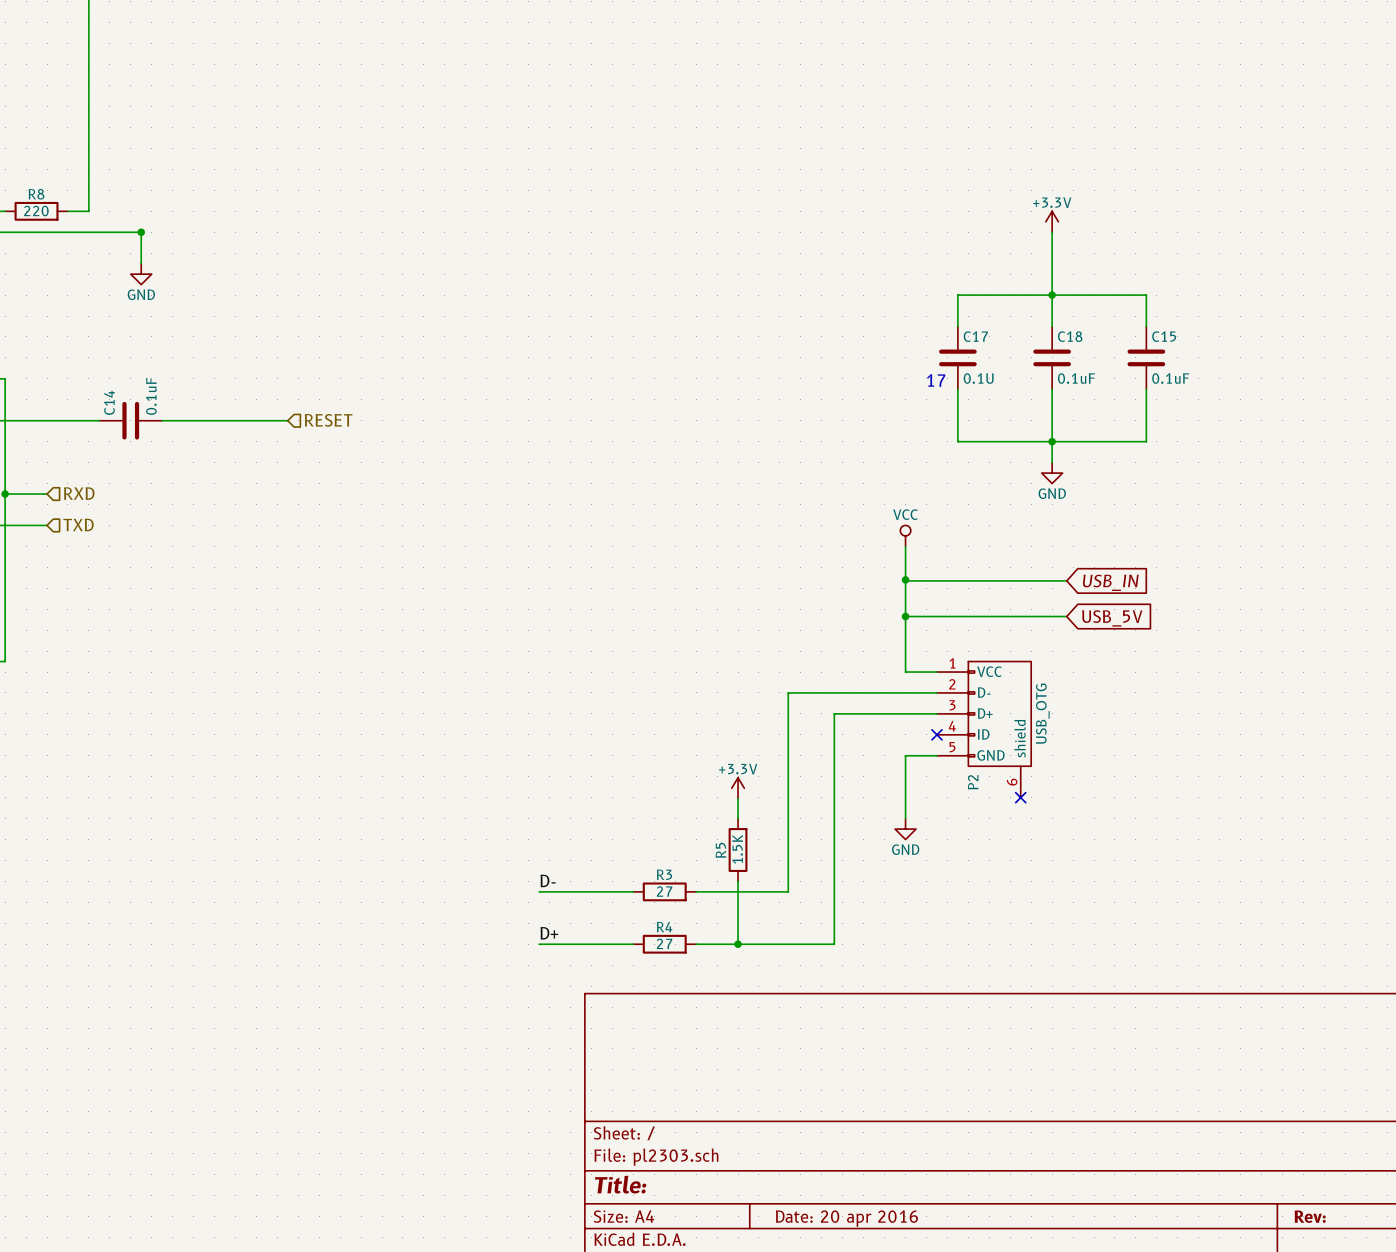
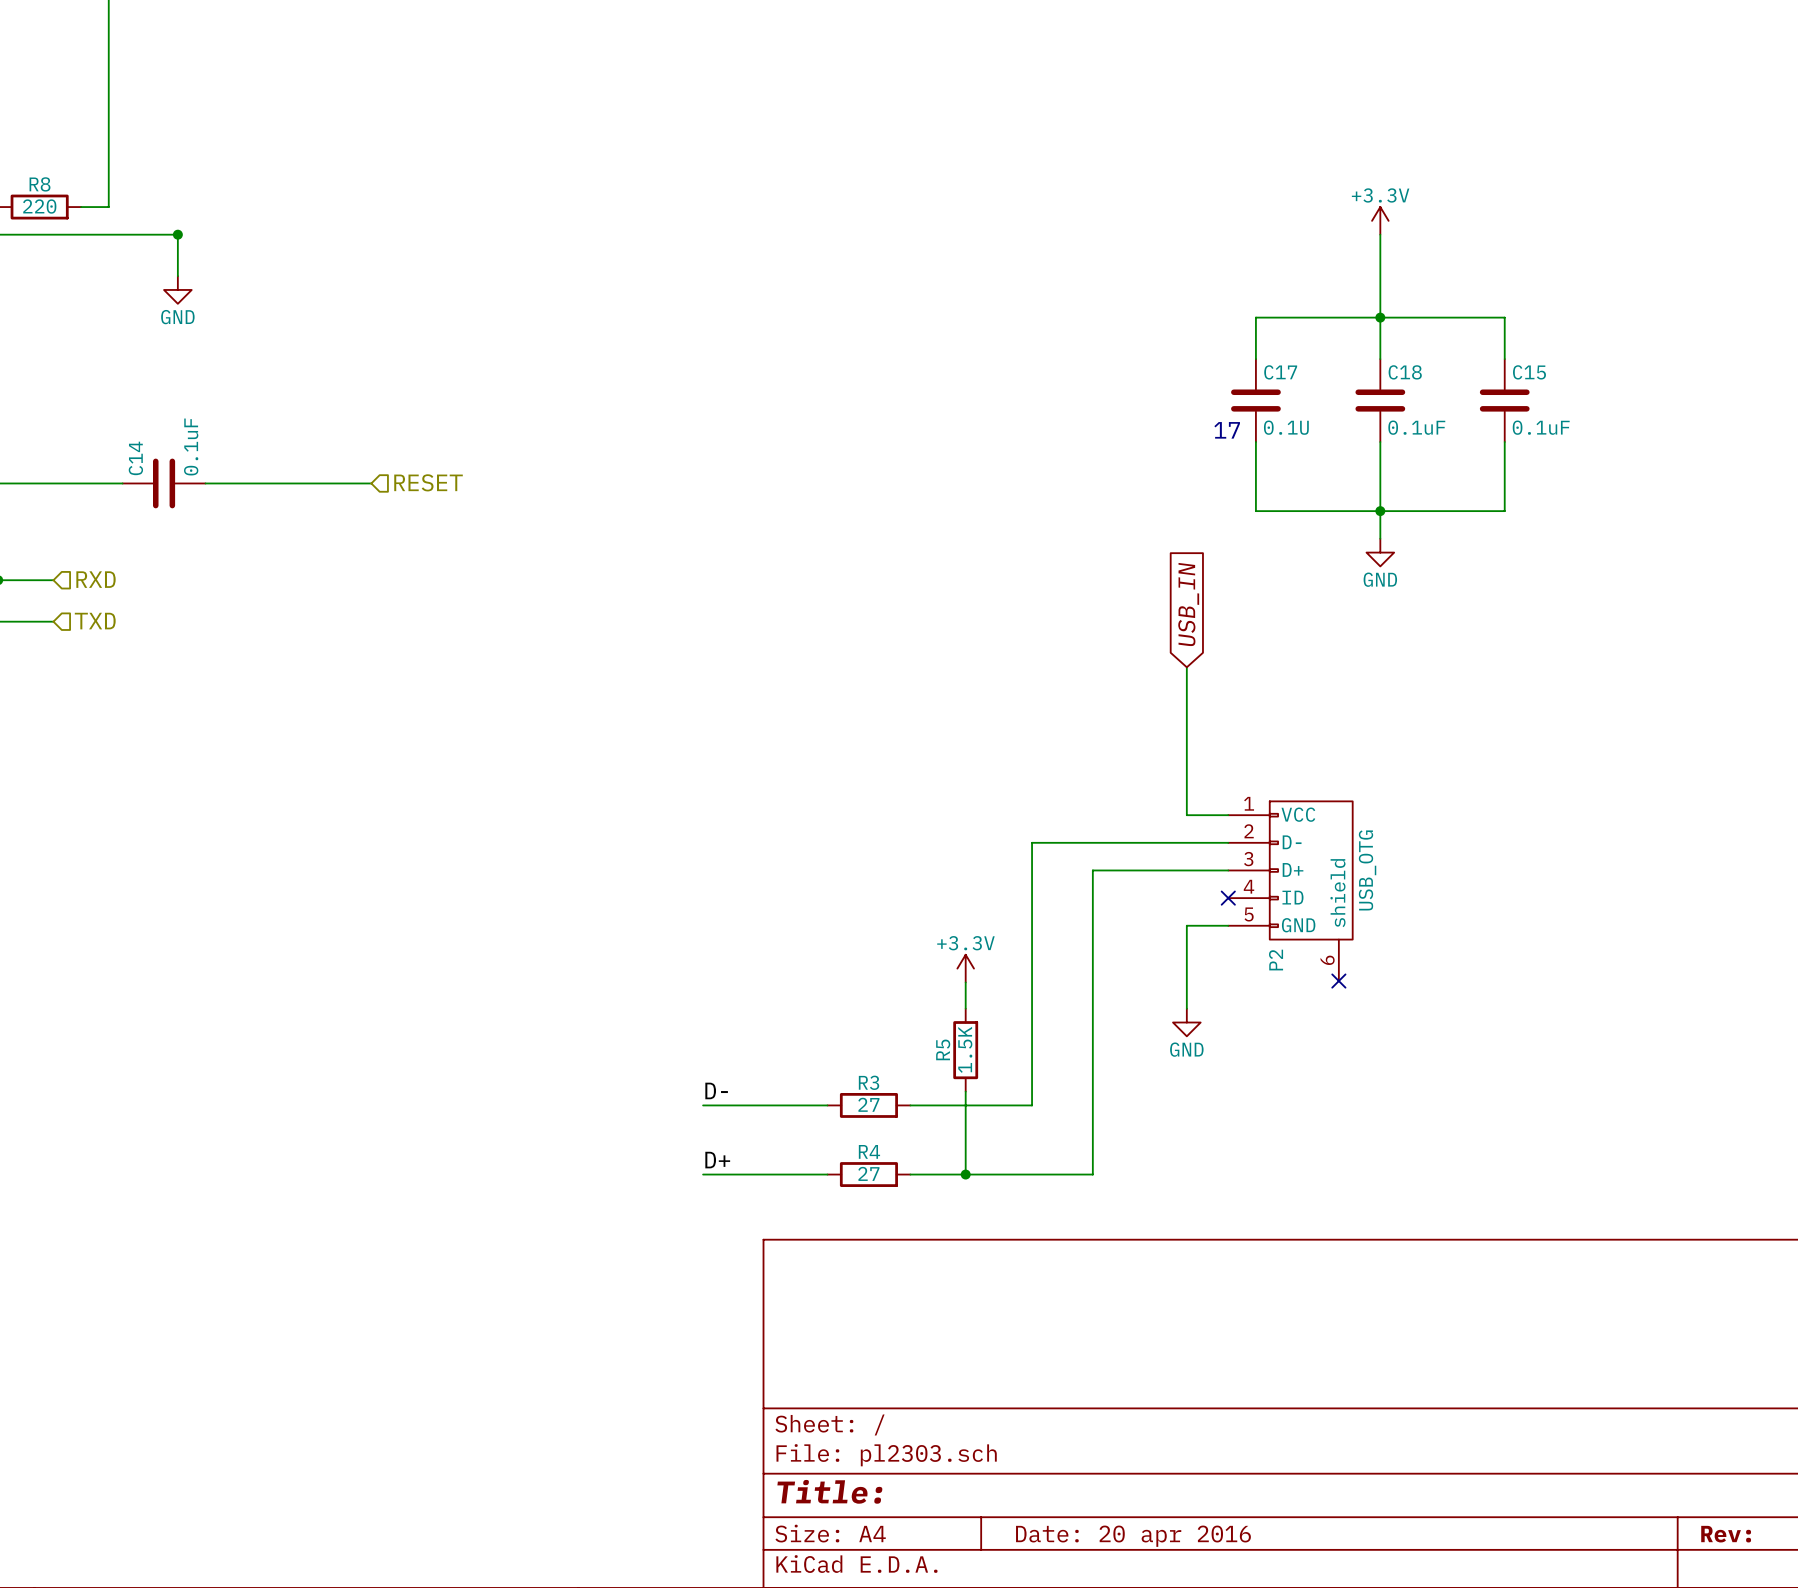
power symbol: VCC (905, 535) -> none
wire: (905, 546) (905, 559) -> none
junction: (905, 579) -> none
wire: (905, 580) (1066, 580) -> none
global label rotation: 0° (1110, 582) -> 90° counterclockwise (1188, 604)
global label position: USB_IN (1110, 582) -> USB_IN (1188, 604)
wire: (905, 616) (1066, 616) -> none
junction: (905, 616) -> none
global label: USB_5V (1112, 618) -> none

